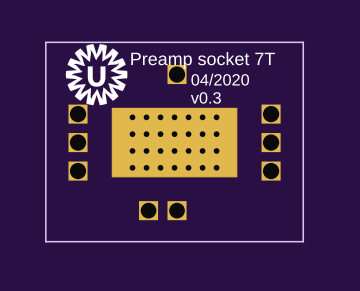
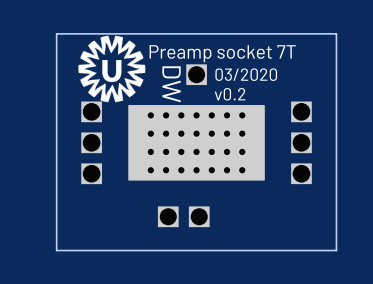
part footprint: [167, 65, 187, 85] -> [186, 64, 207, 86]
text: 04/2020 (220, 79) -> 03/2020 (246, 74)
text: none -> DW (171, 84)
text: v0.3 (205, 97) -> v0.2 (230, 94)

